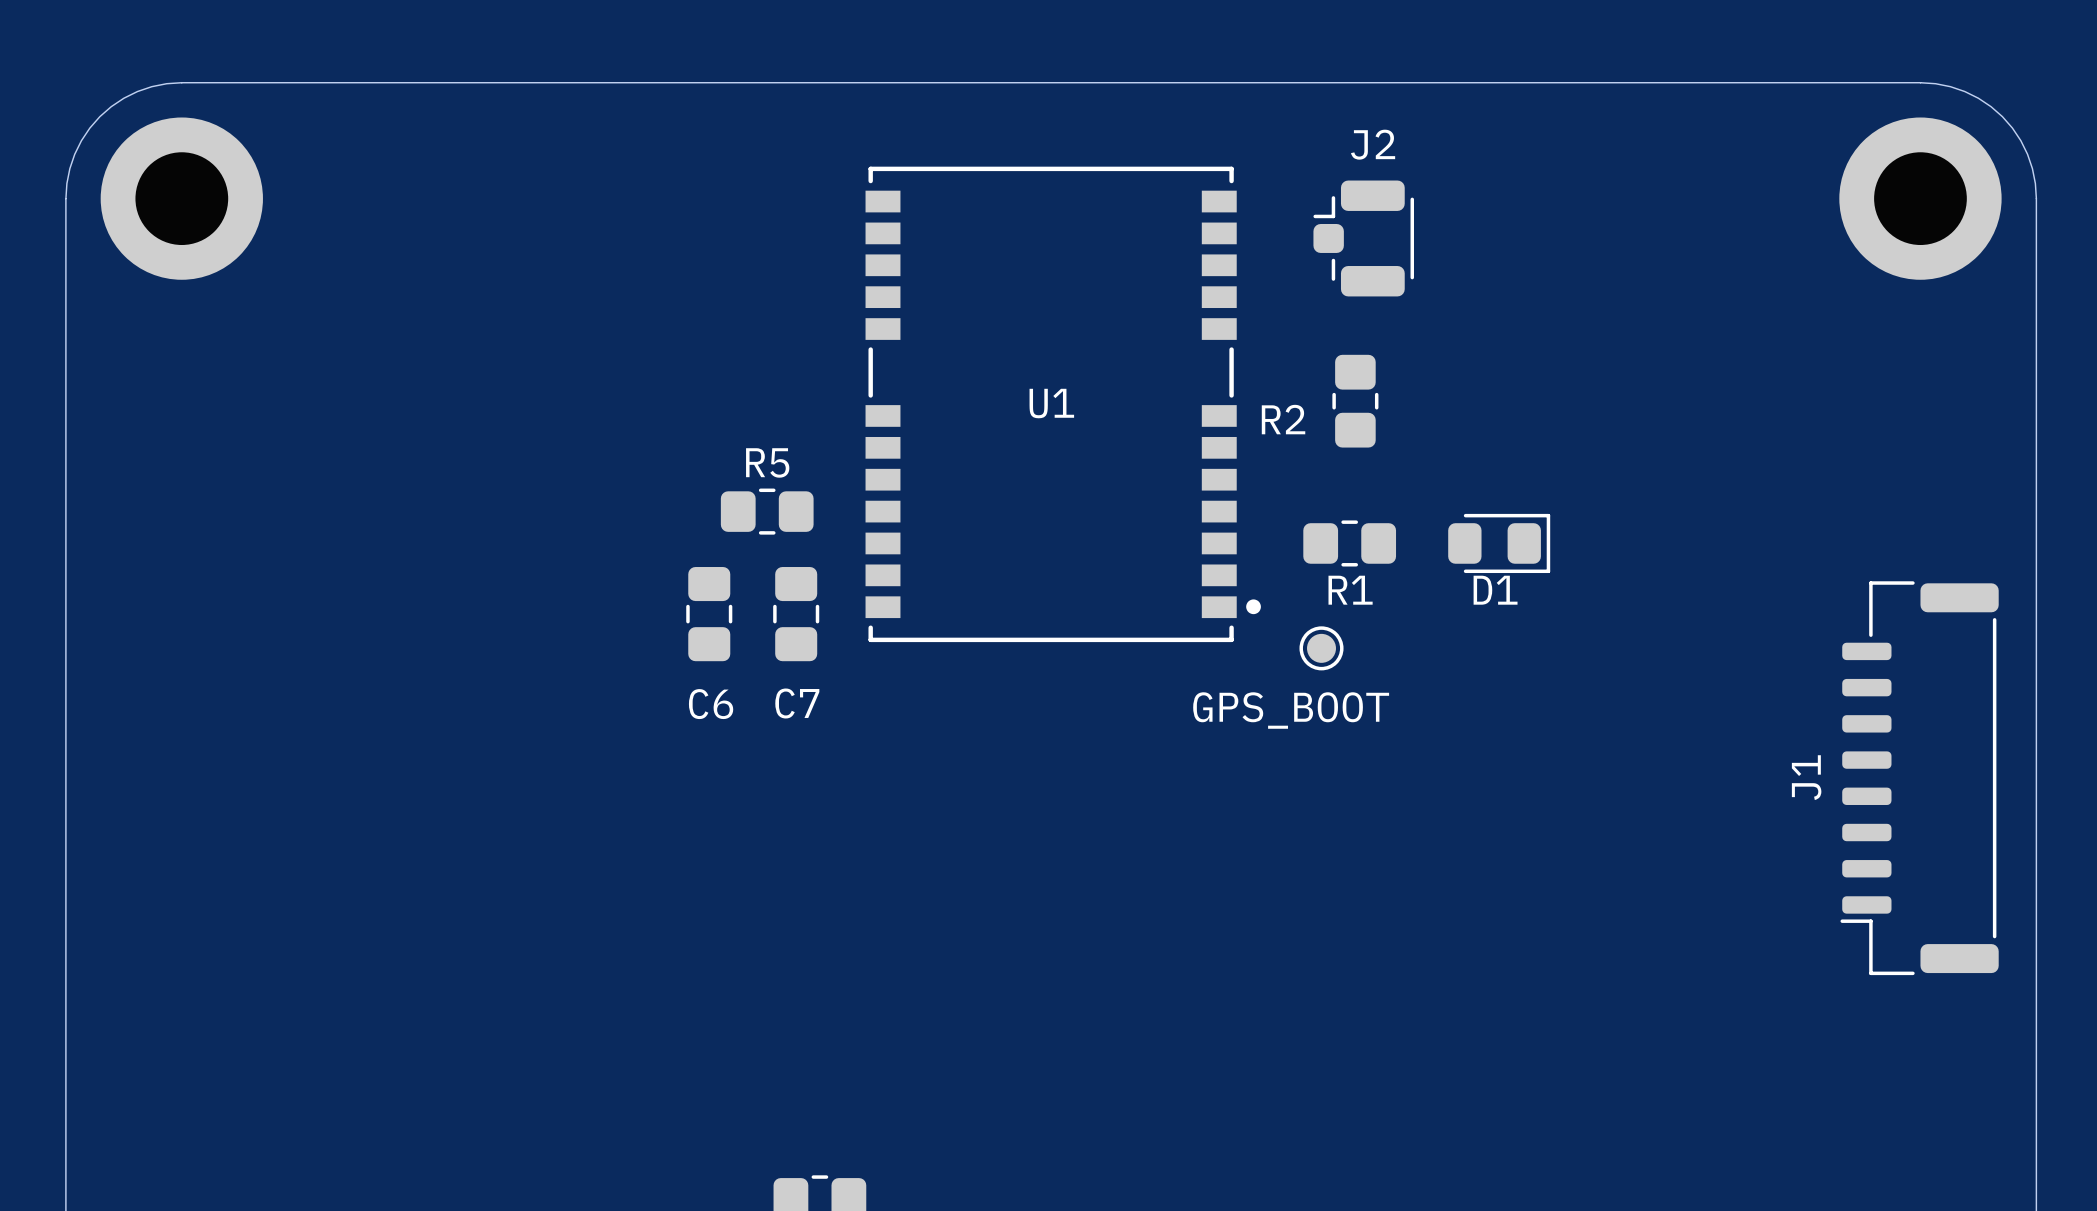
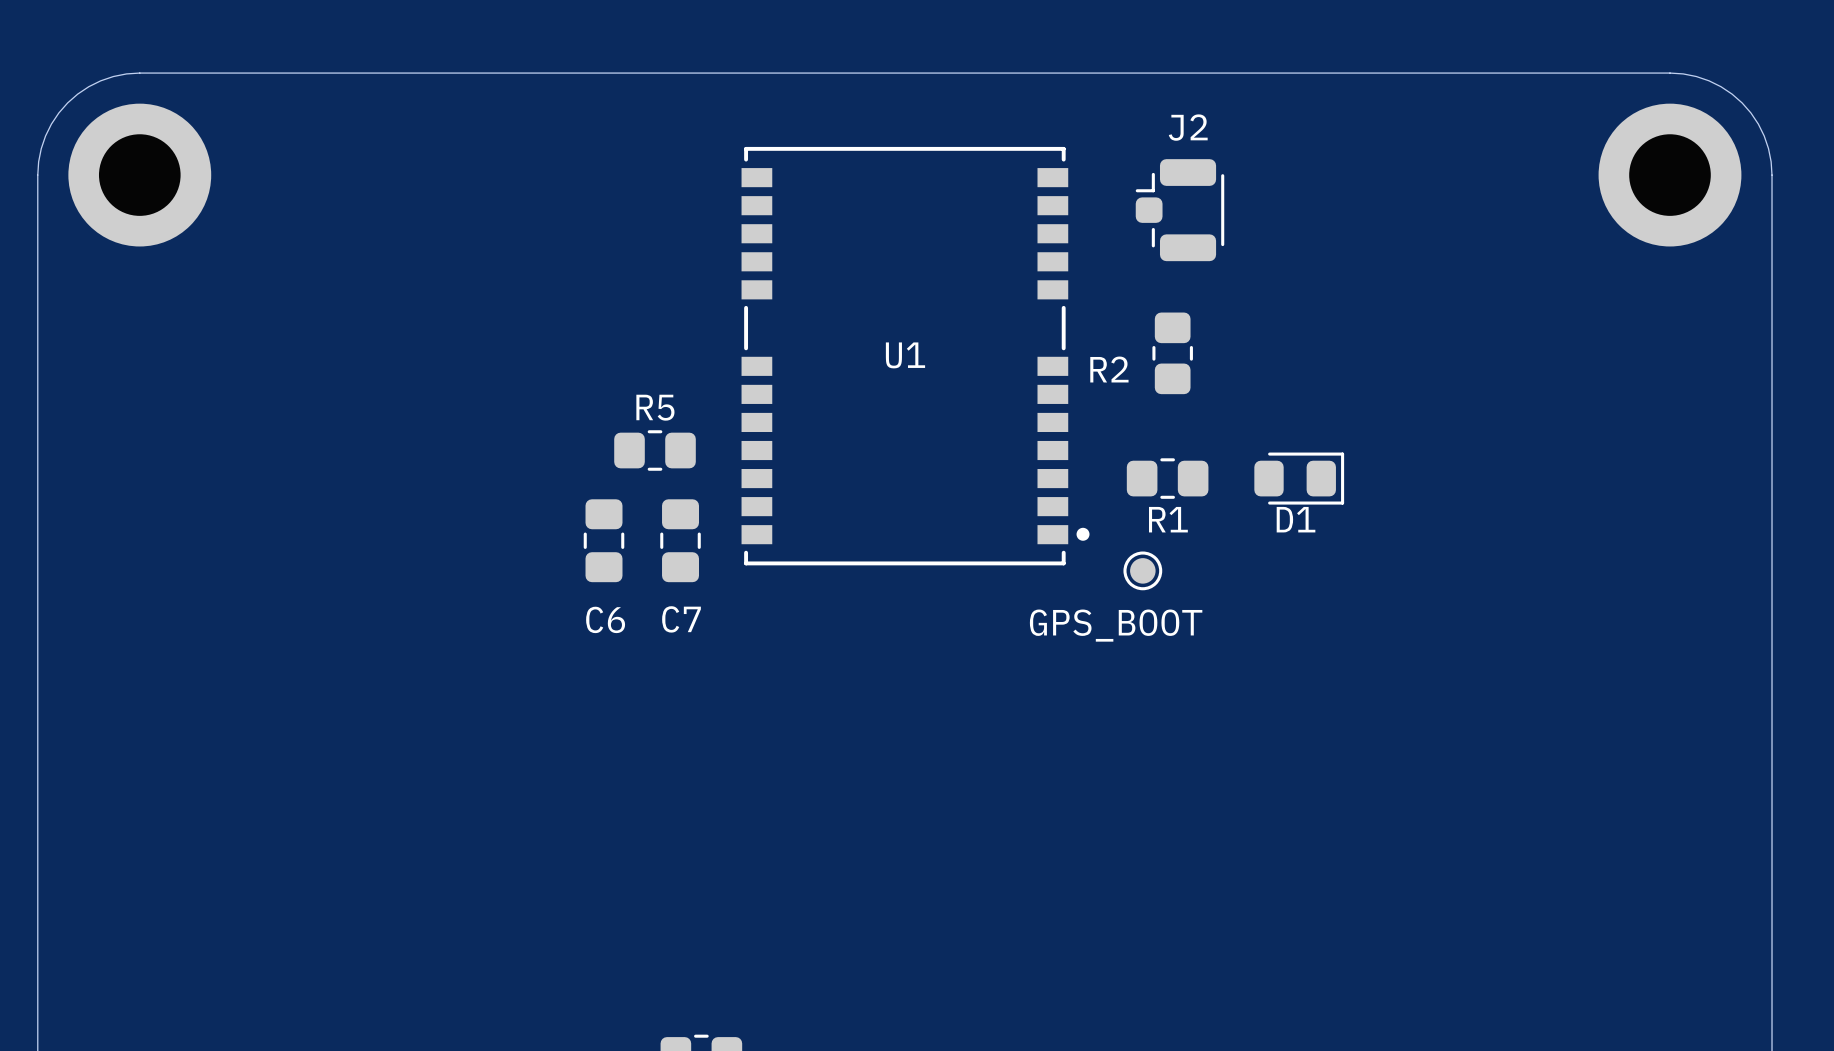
J1: (1919, 778) -> none

